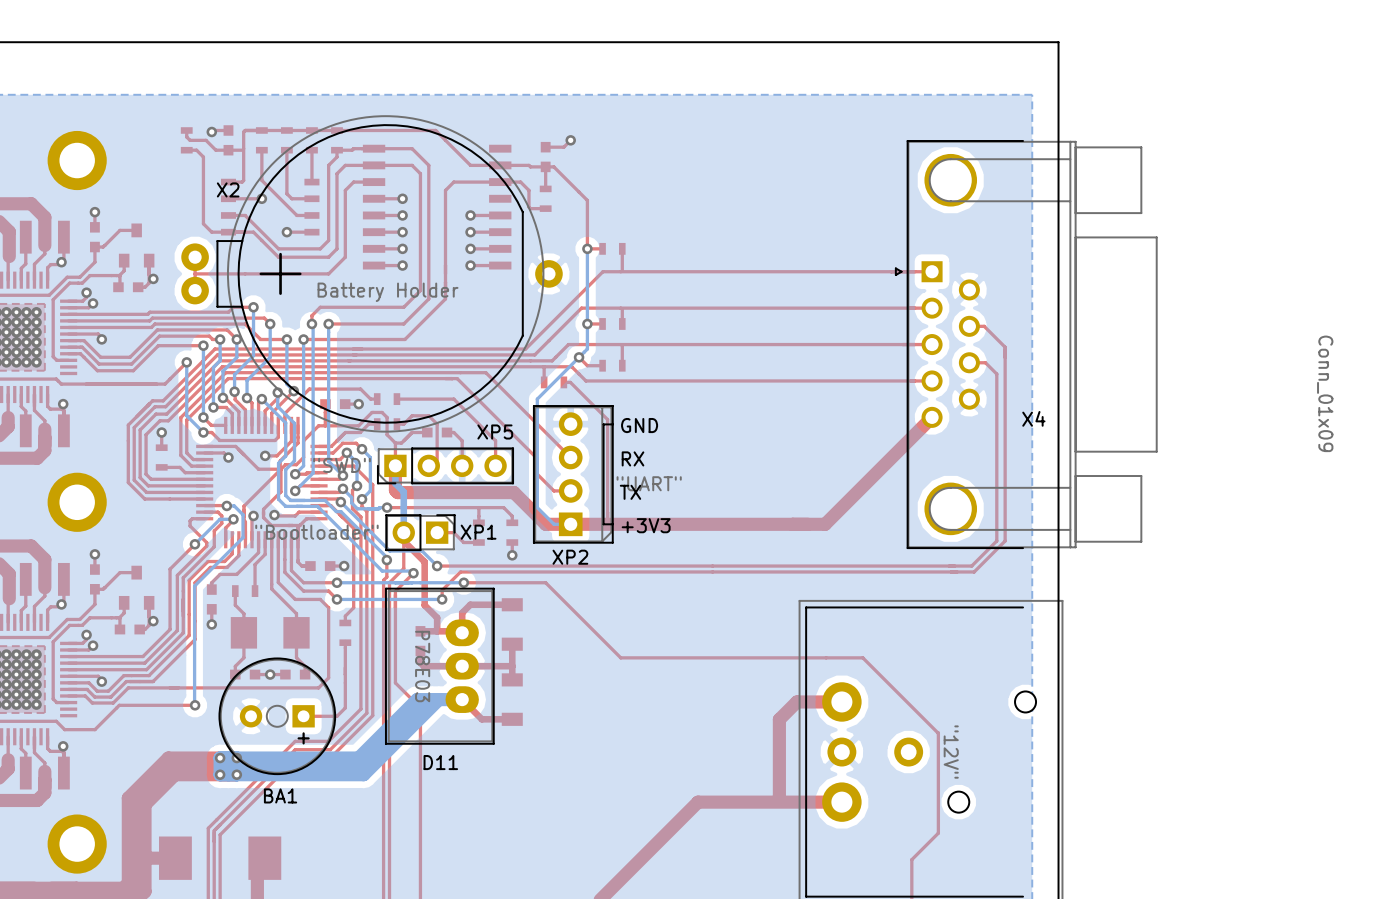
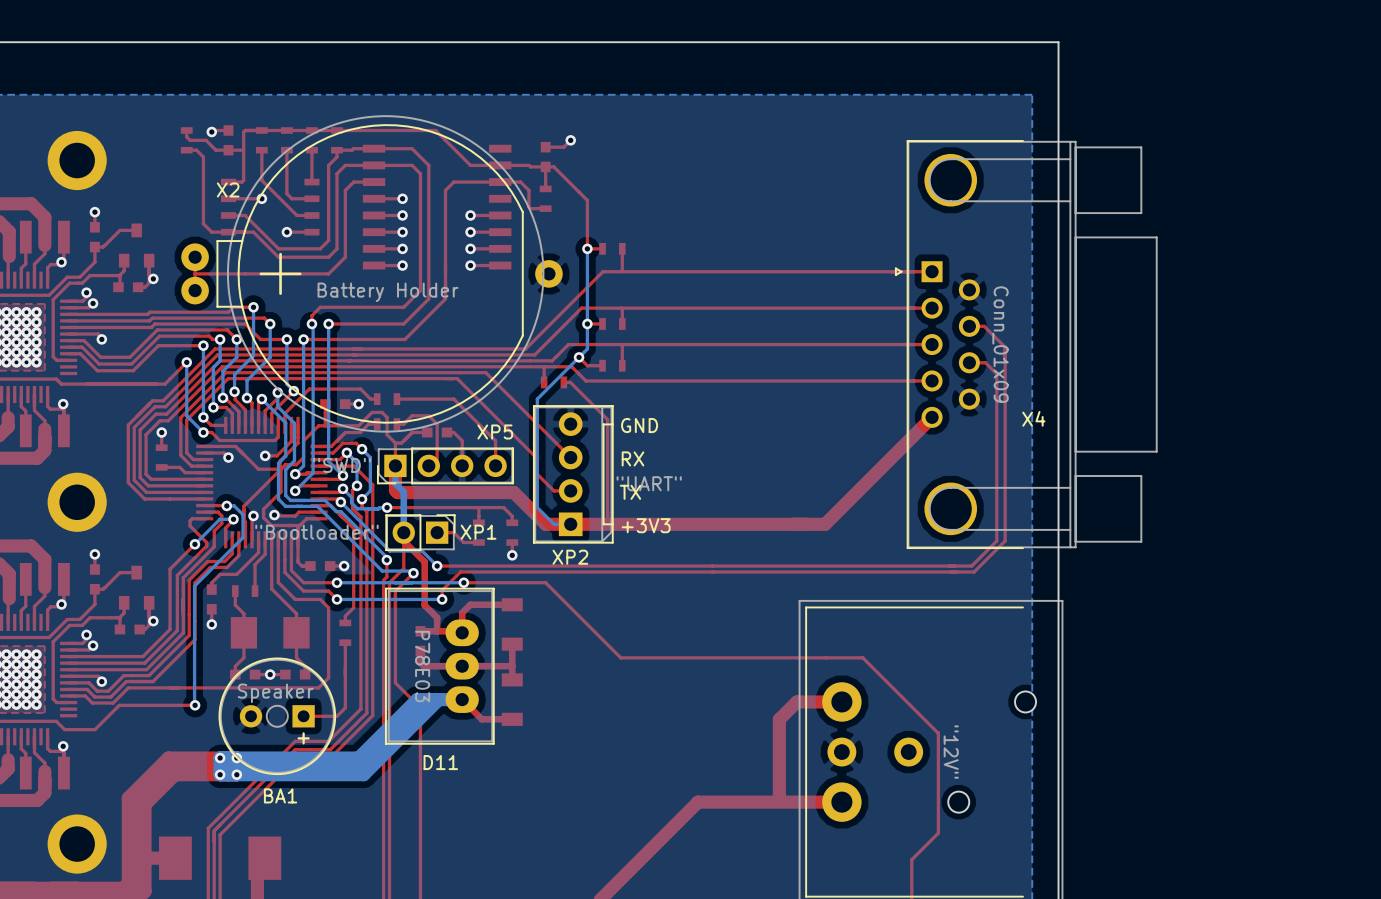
X4 value position: Conn_01x09 (1325, 393) -> Conn_01x09 (1000, 344)
BA1 value: none -> Speaker (275, 693)

